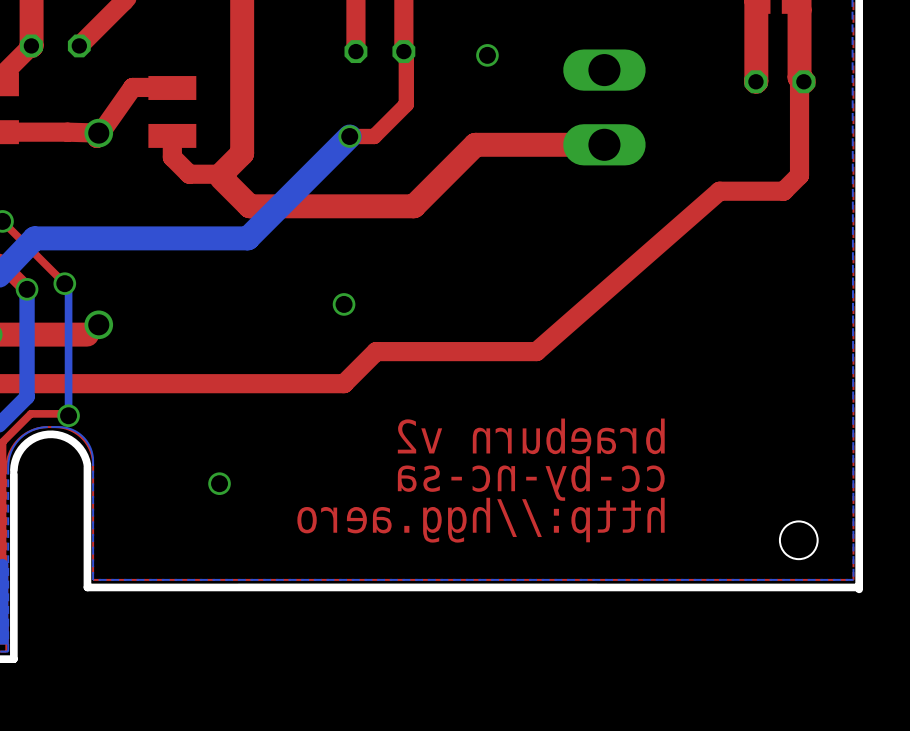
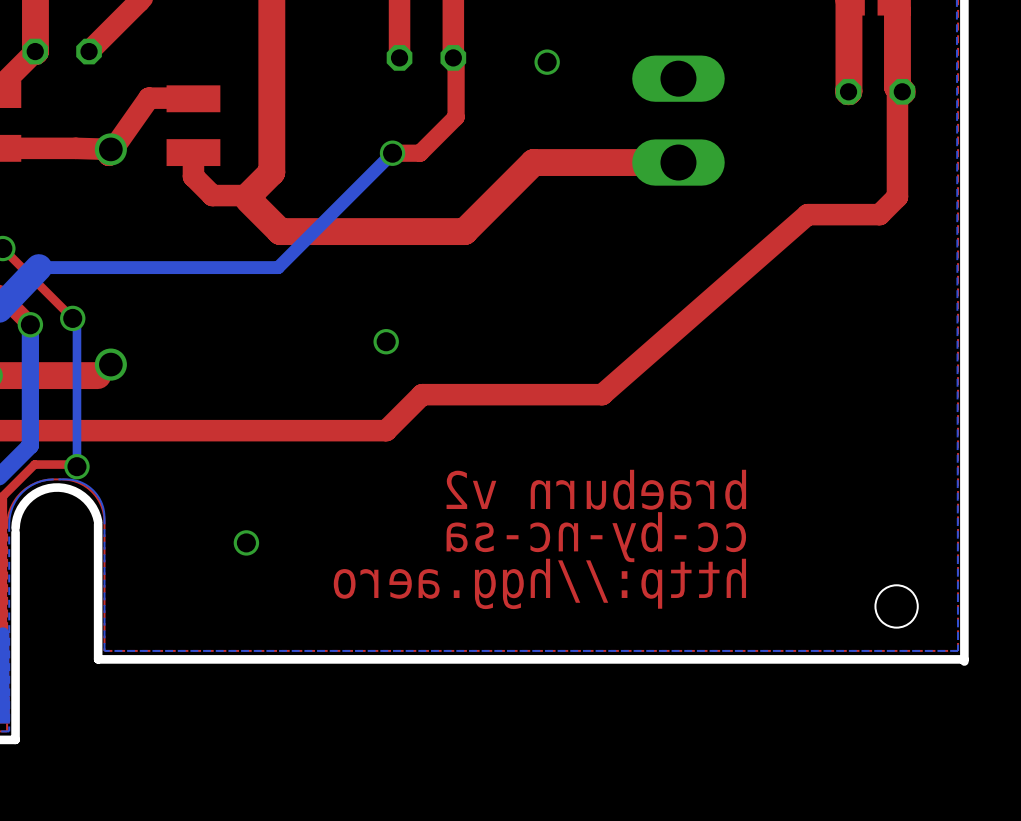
bottom track width: thick (349, 136) (247, 238) (34, 238) -> thin (392, 153) (278, 267) (38, 267)

